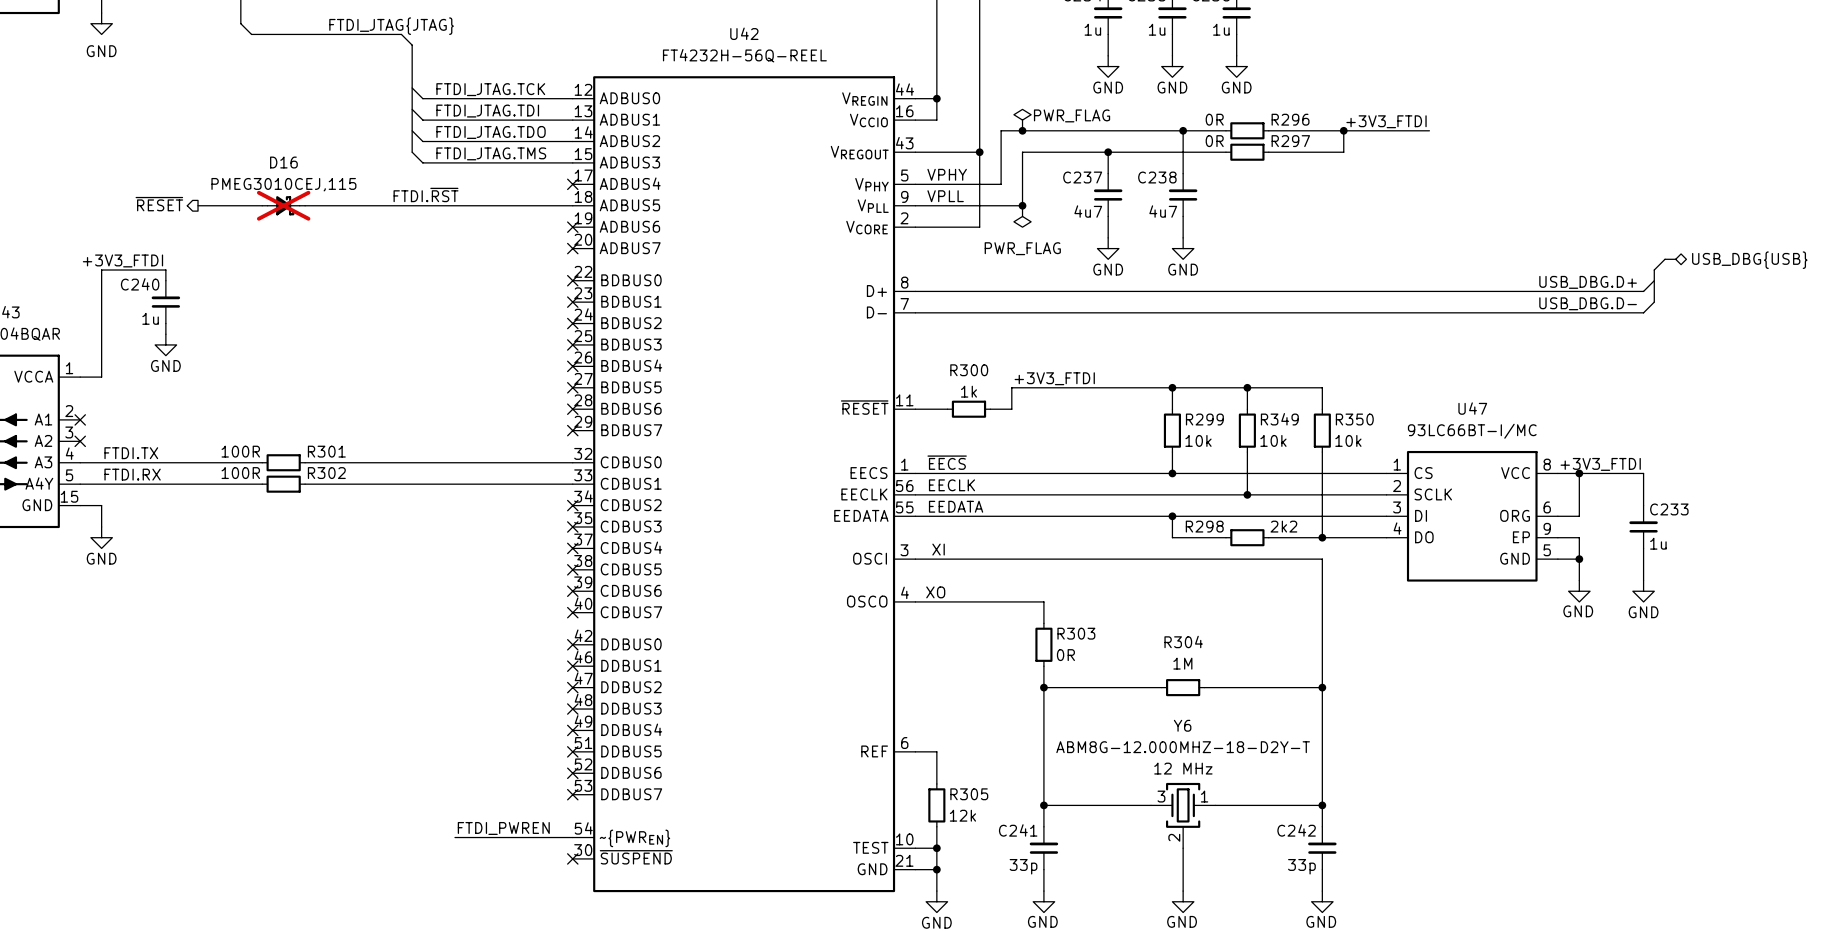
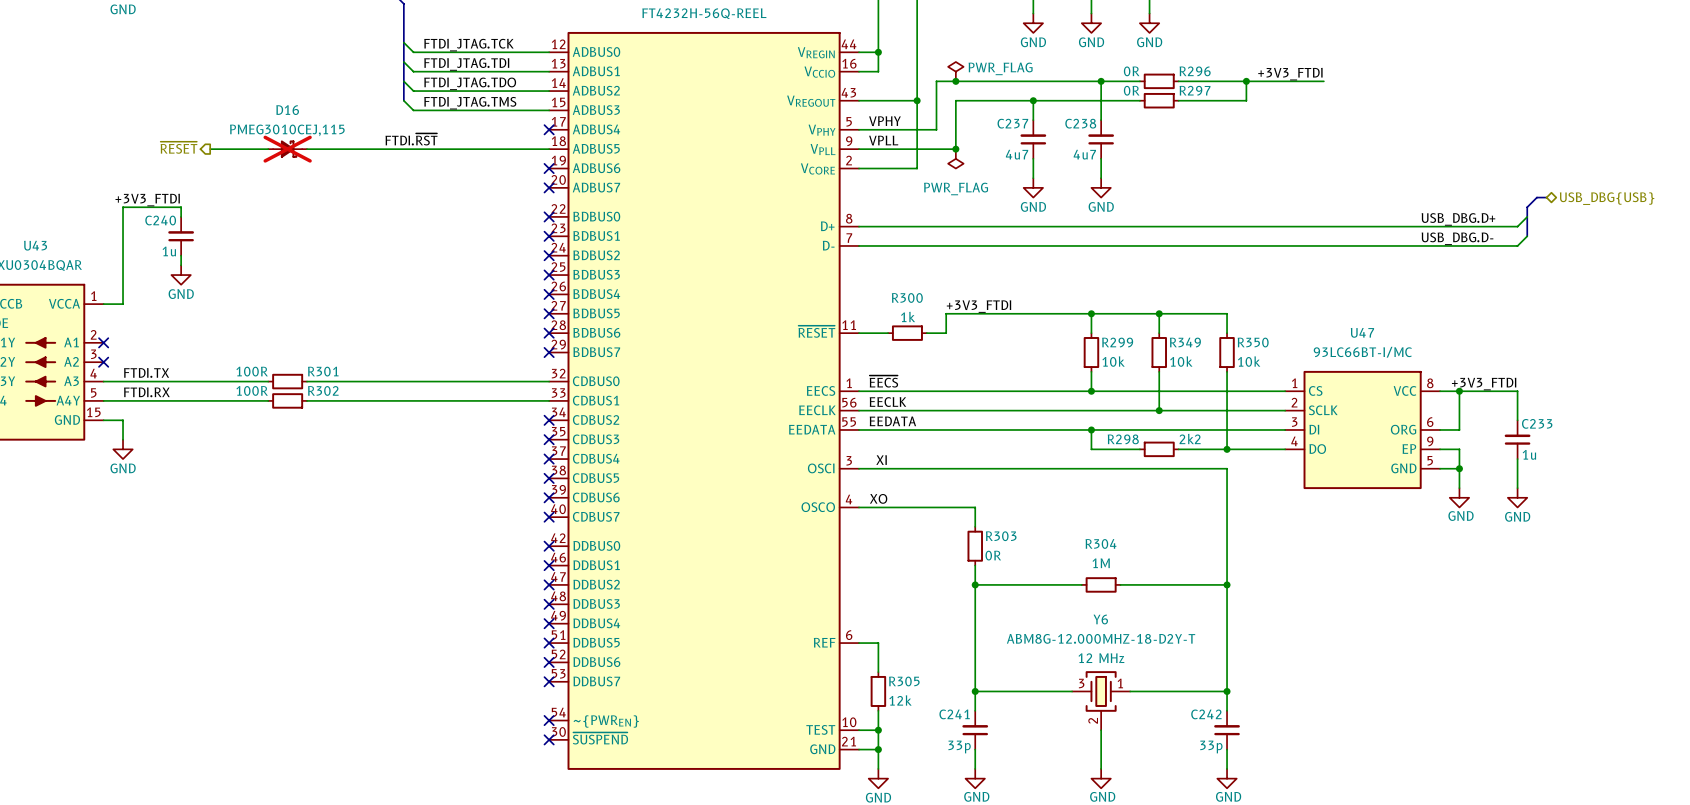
label: FTDI_PWREN (503, 828) -> none
wire: (455, 837) (572, 837) -> none
no-connect mark: none -> (549, 720)

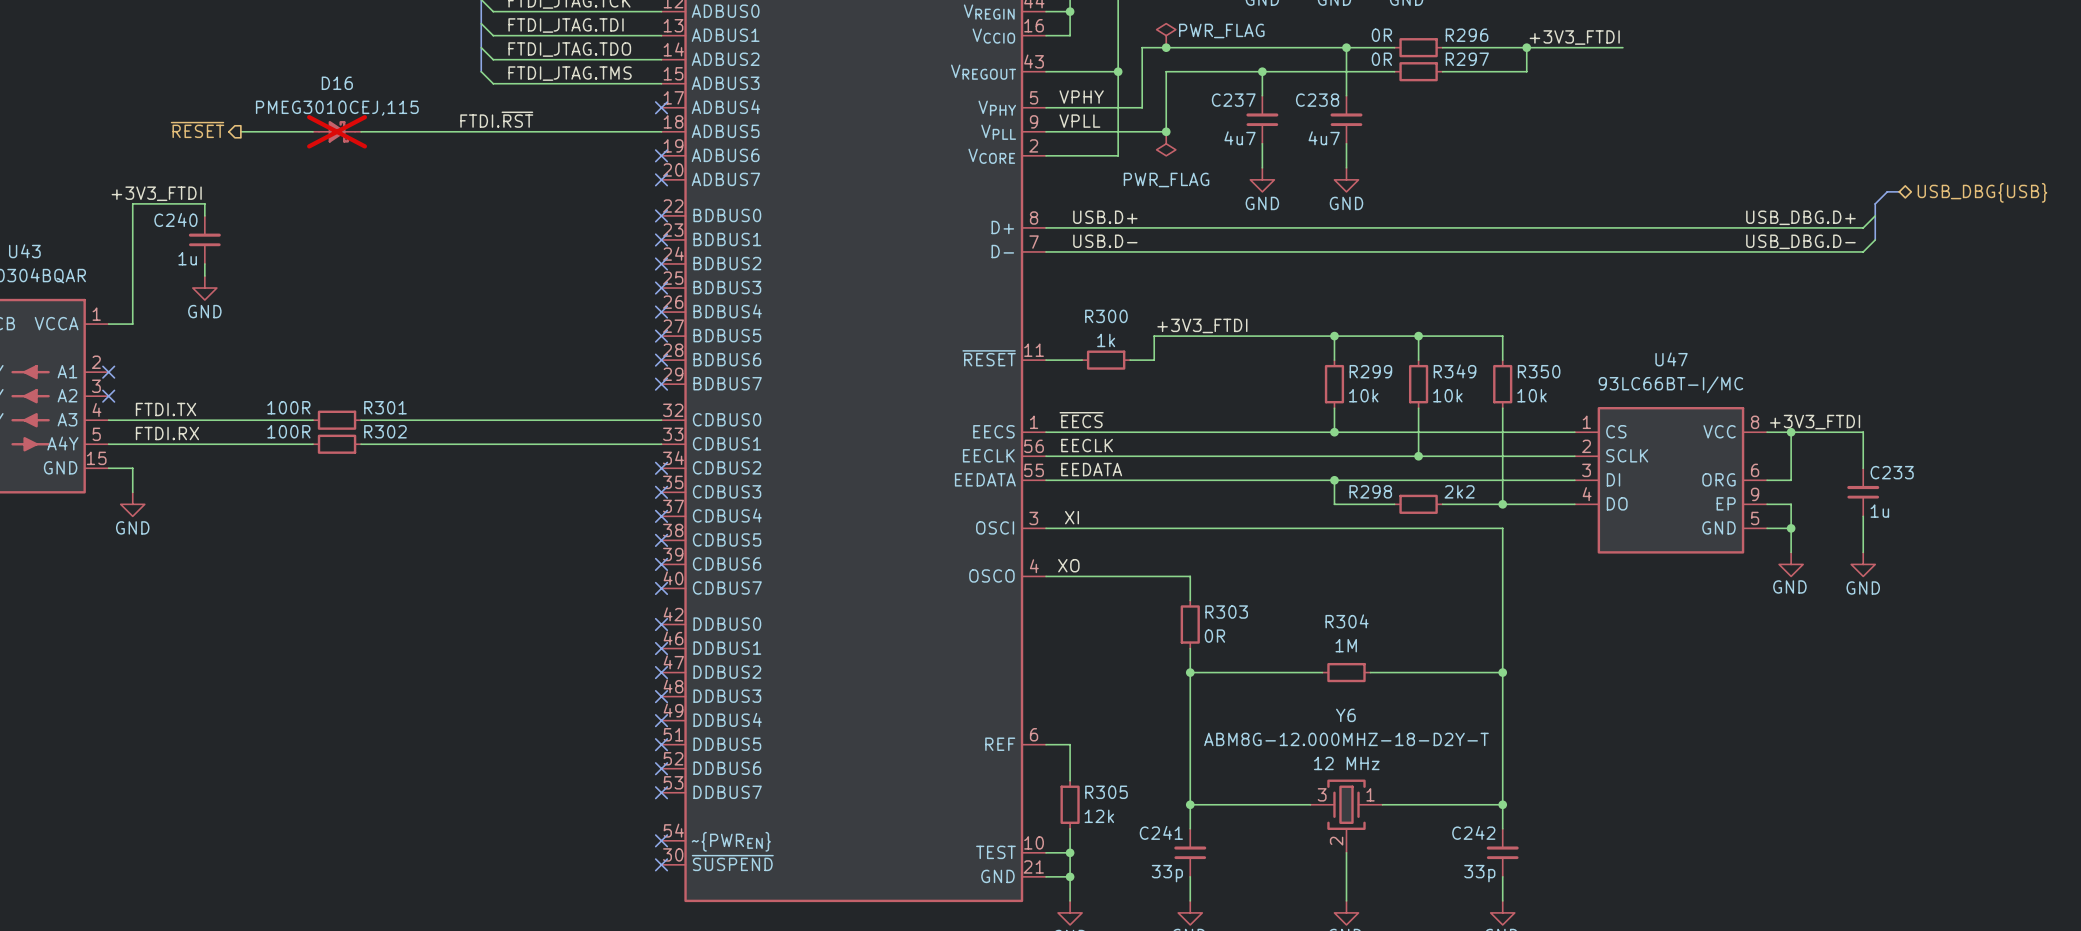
label: none -> USB.D+ (1105, 217)
label: none -> USB.D- (1105, 241)

